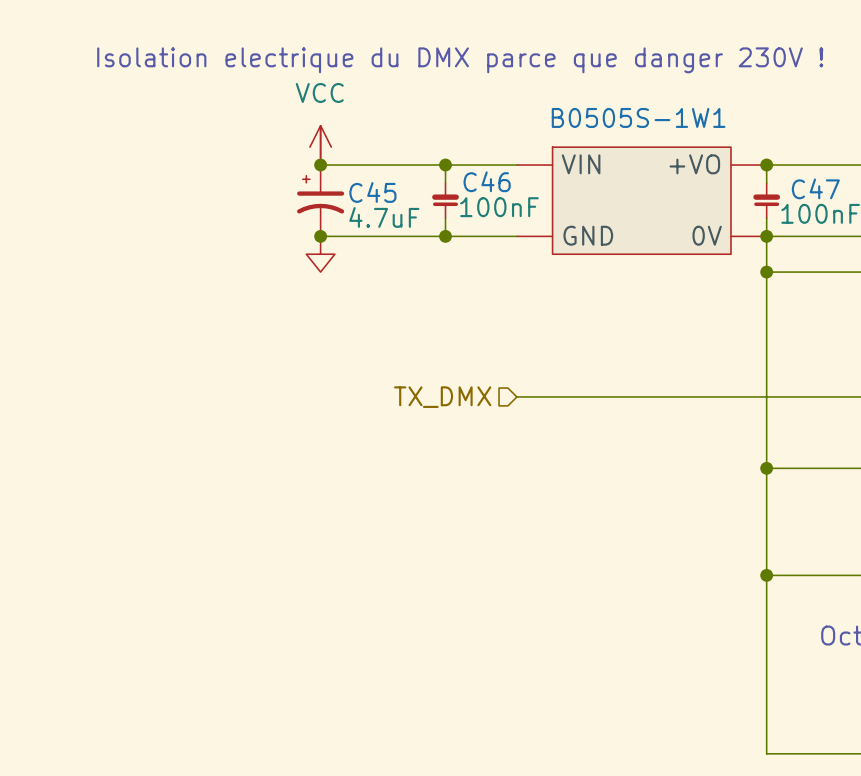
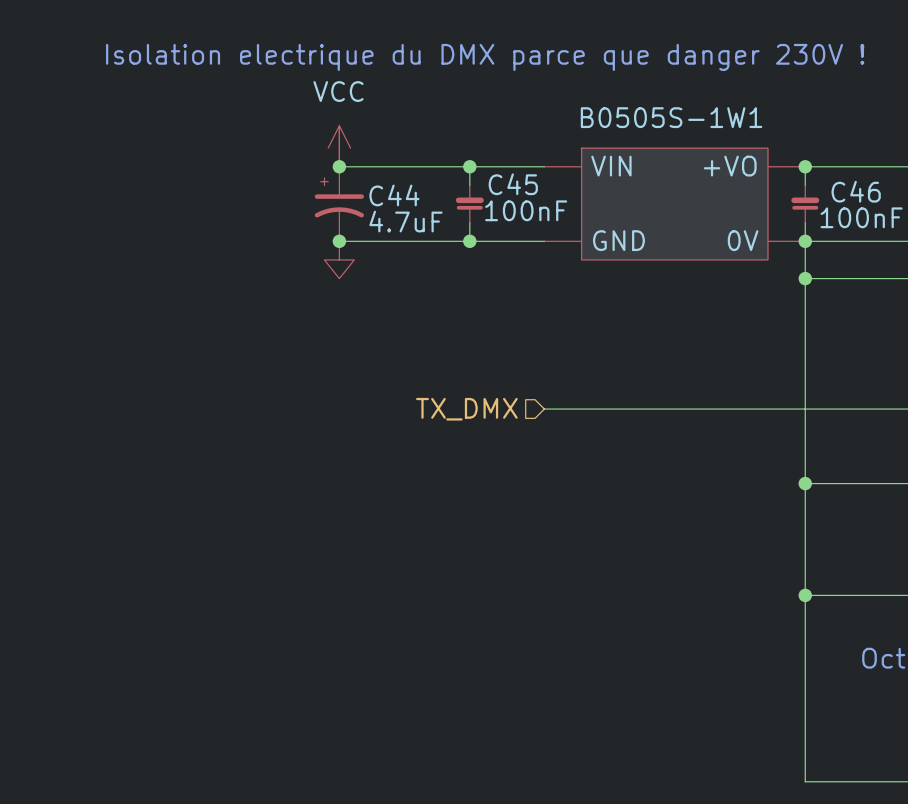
C46 name: C46 (487, 181) -> C45 (513, 184)
C47 name: C47 (815, 188) -> C46 (856, 191)
C45 name: C45 (372, 192) -> C44 (394, 195)

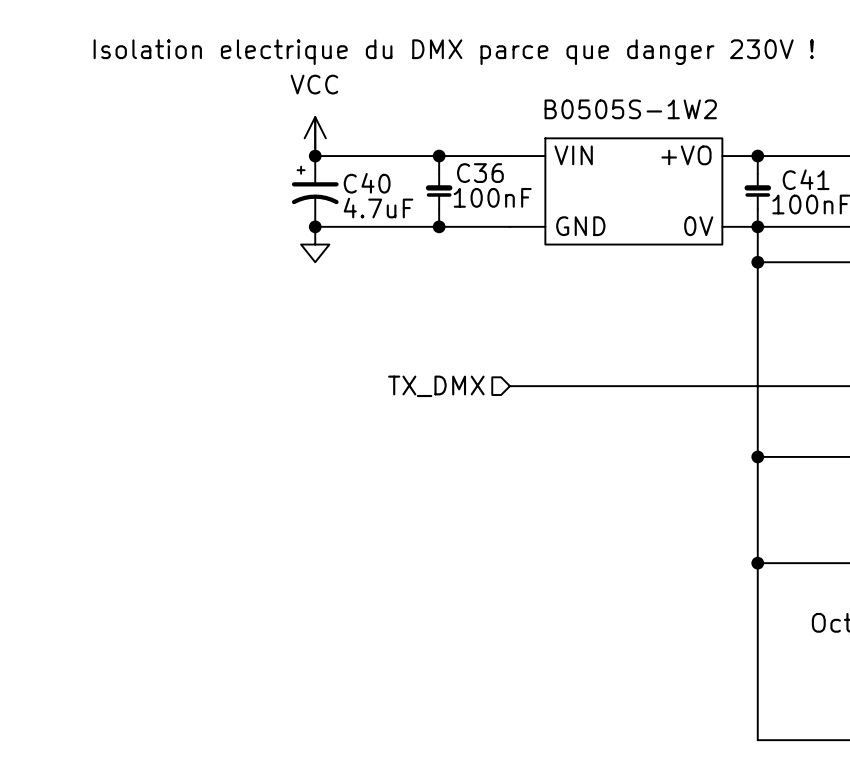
B0505S-1W1 name: B0505S-1W1 (671, 117) -> B0505S-1W2 (630, 109)
C45 name: C45 (513, 184) -> C36 (480, 173)
C46 name: C46 (856, 191) -> C41 (806, 179)
C44 name: C44 (394, 195) -> C40 (367, 183)

